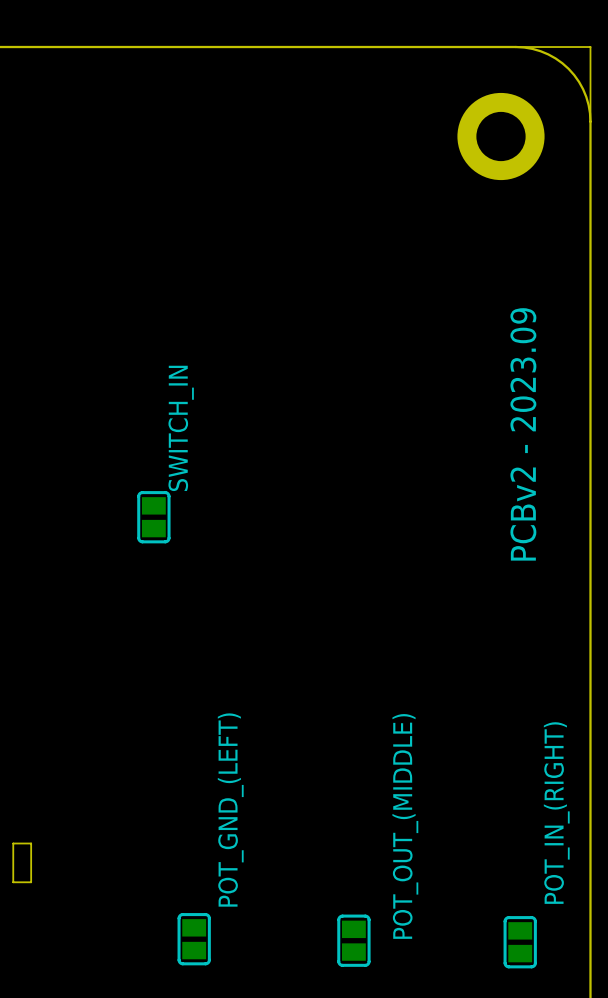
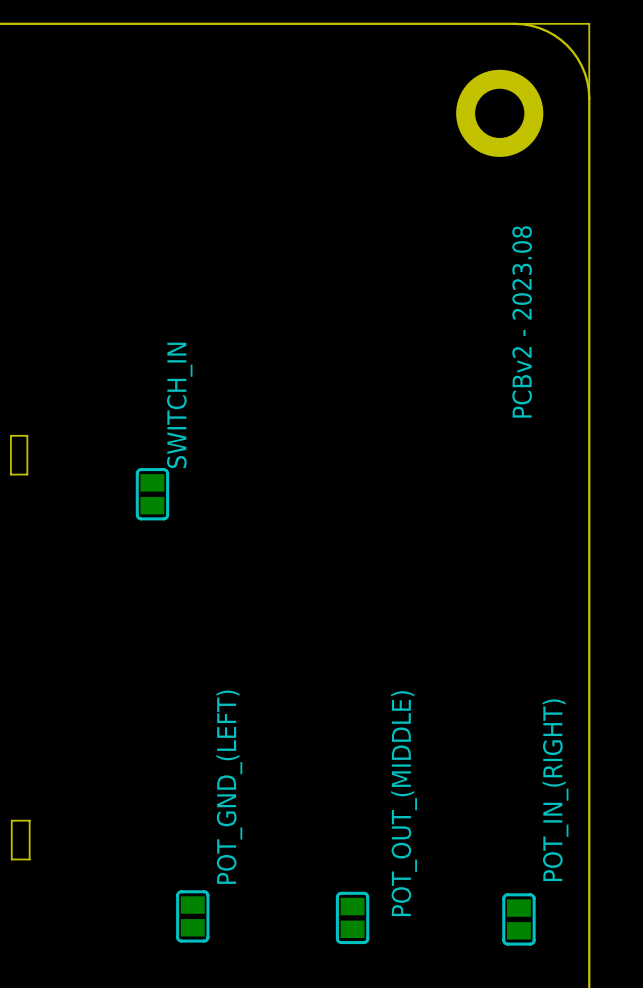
text: PCBv2 - 2023.09 (523, 434) -> PCBv2 - 2023.08 (522, 321)
board edge: none -> (27, 435) (10, 435) (10, 474) (27, 474) (27, 435)

